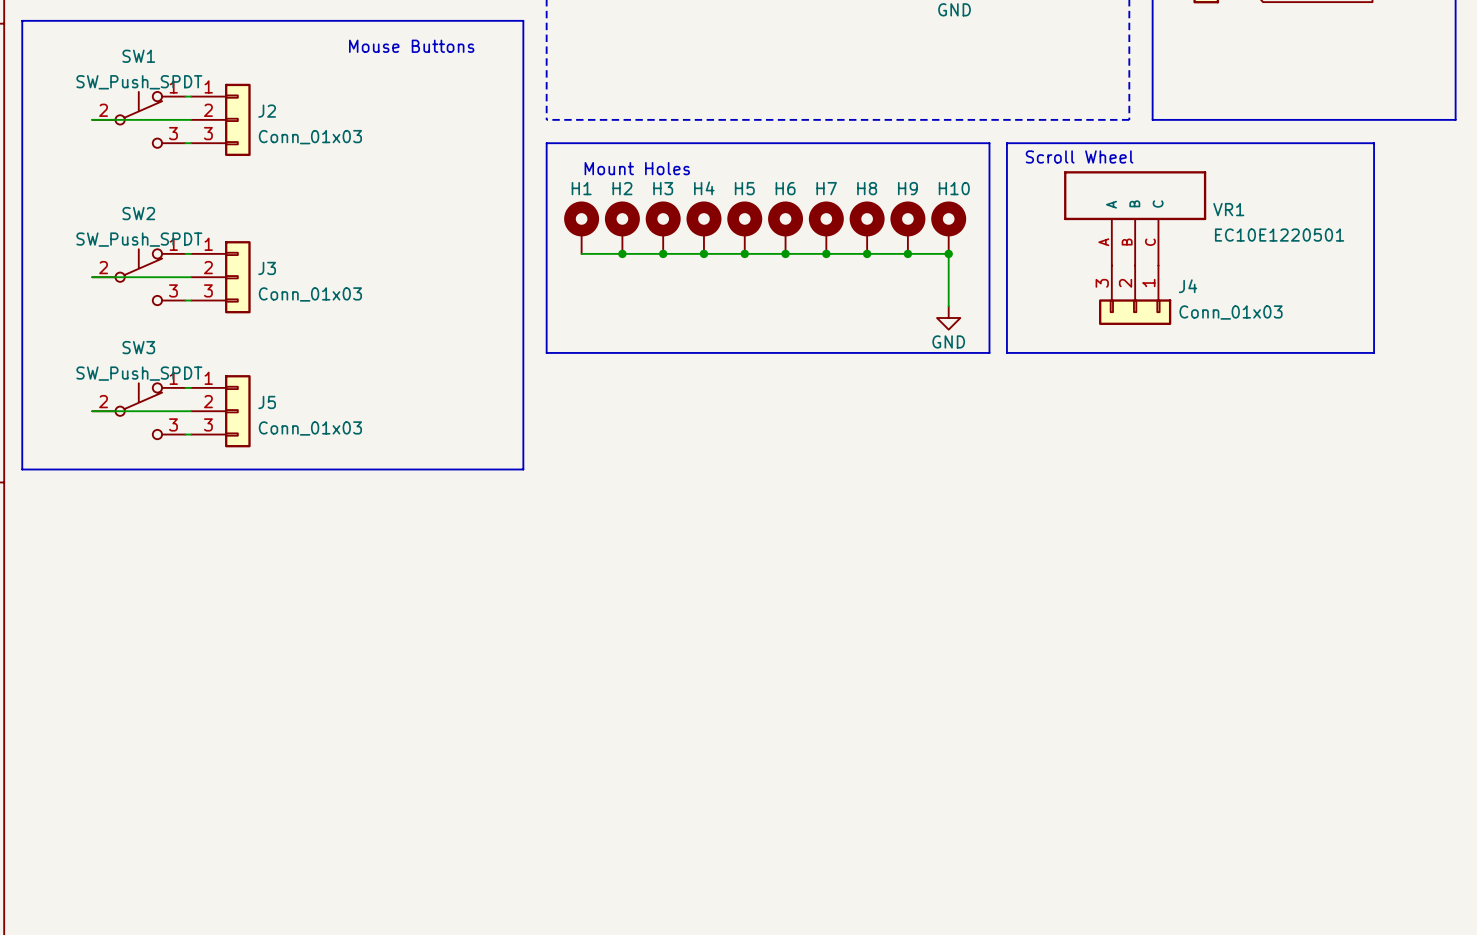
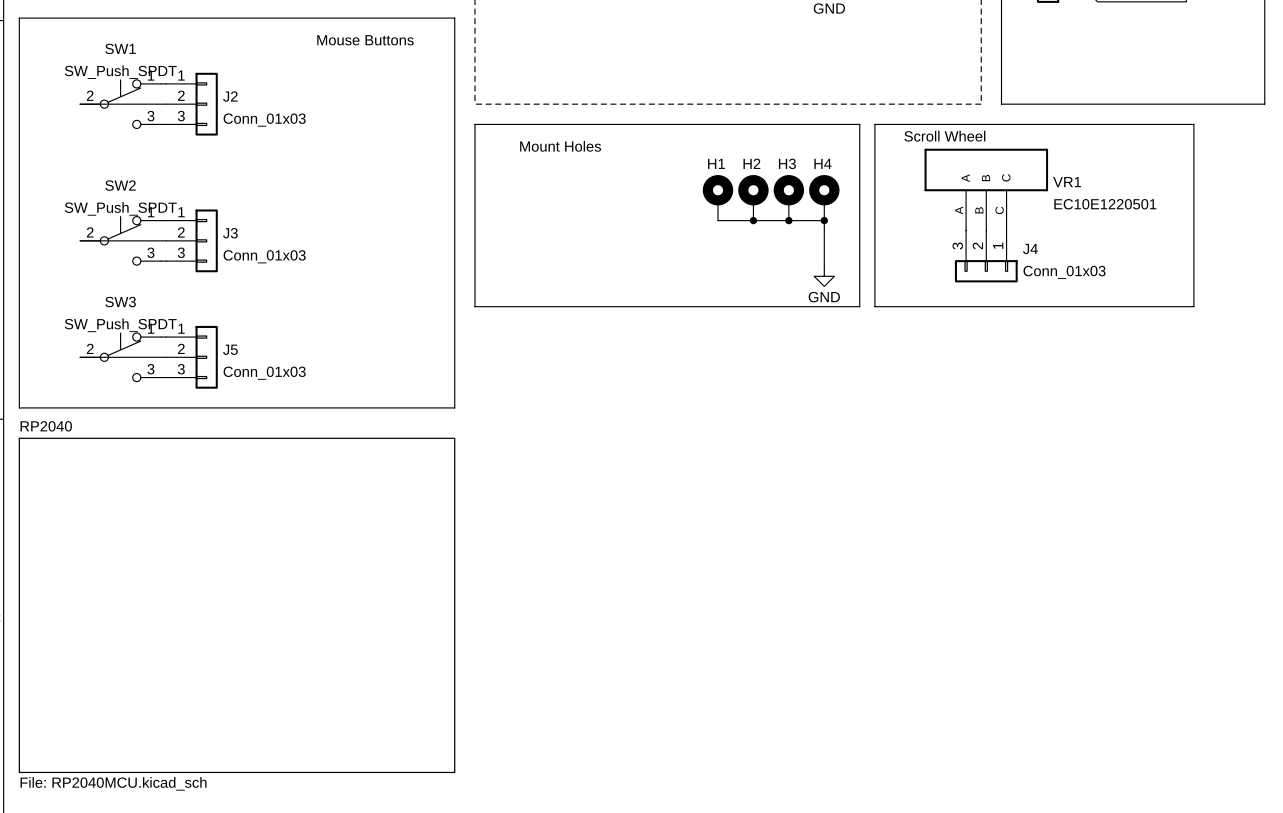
H7 name: H7 (826, 188) -> H1 (716, 163)
H8 name: H8 (867, 188) -> H2 (751, 163)
H9 name: H9 (907, 188) -> H3 (787, 163)
H10 name: H10 (954, 188) -> H4 (822, 163)
H1: (581, 227) -> none
H2: (622, 227) -> none
H3: (663, 227) -> none
H4: (703, 227) -> none
H5: (744, 227) -> none
H6: (785, 227) -> none
wire: (581, 253) (826, 253) -> none
junction: (622, 253) -> none
junction: (663, 253) -> none
junction: (703, 253) -> none
junction: (744, 253) -> none
junction: (785, 253) -> none
junction: (826, 253) -> none
sheet RP2040: none -> File: RP2040MCU.kicad_sch (237, 605)

